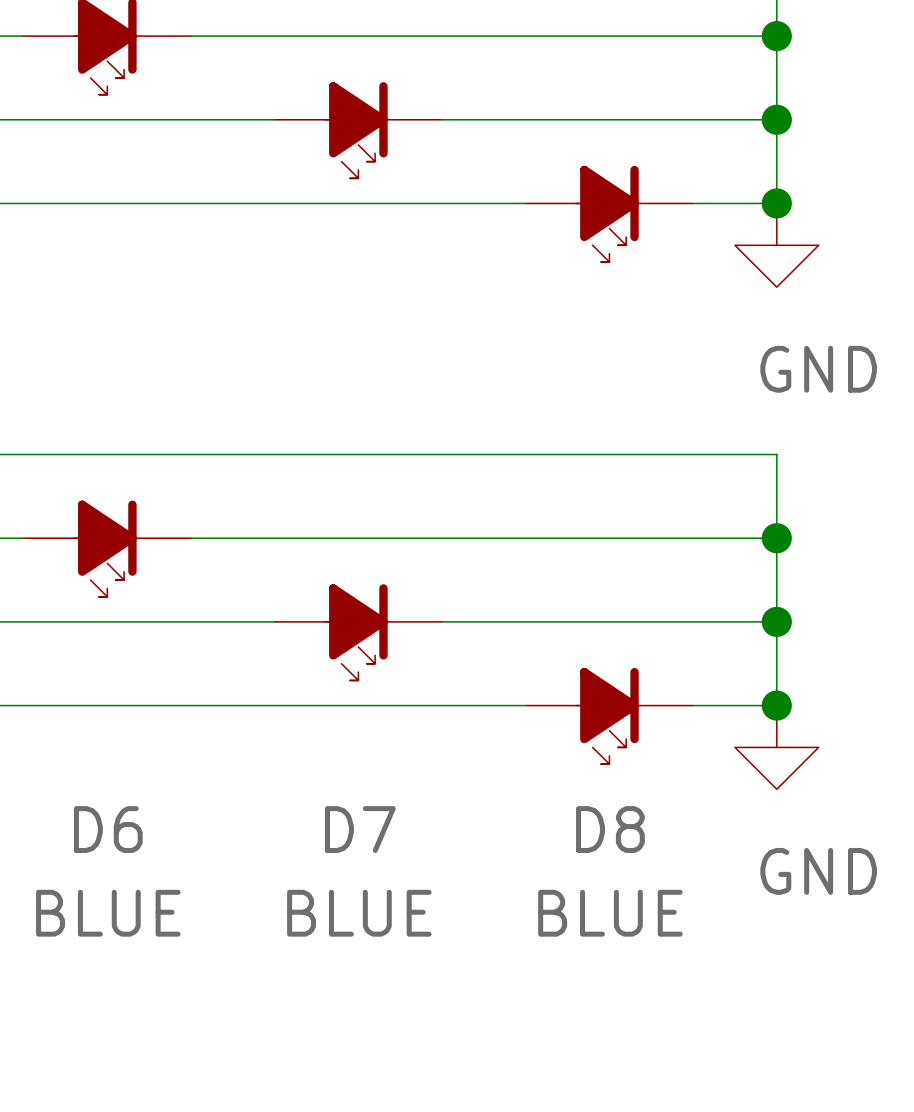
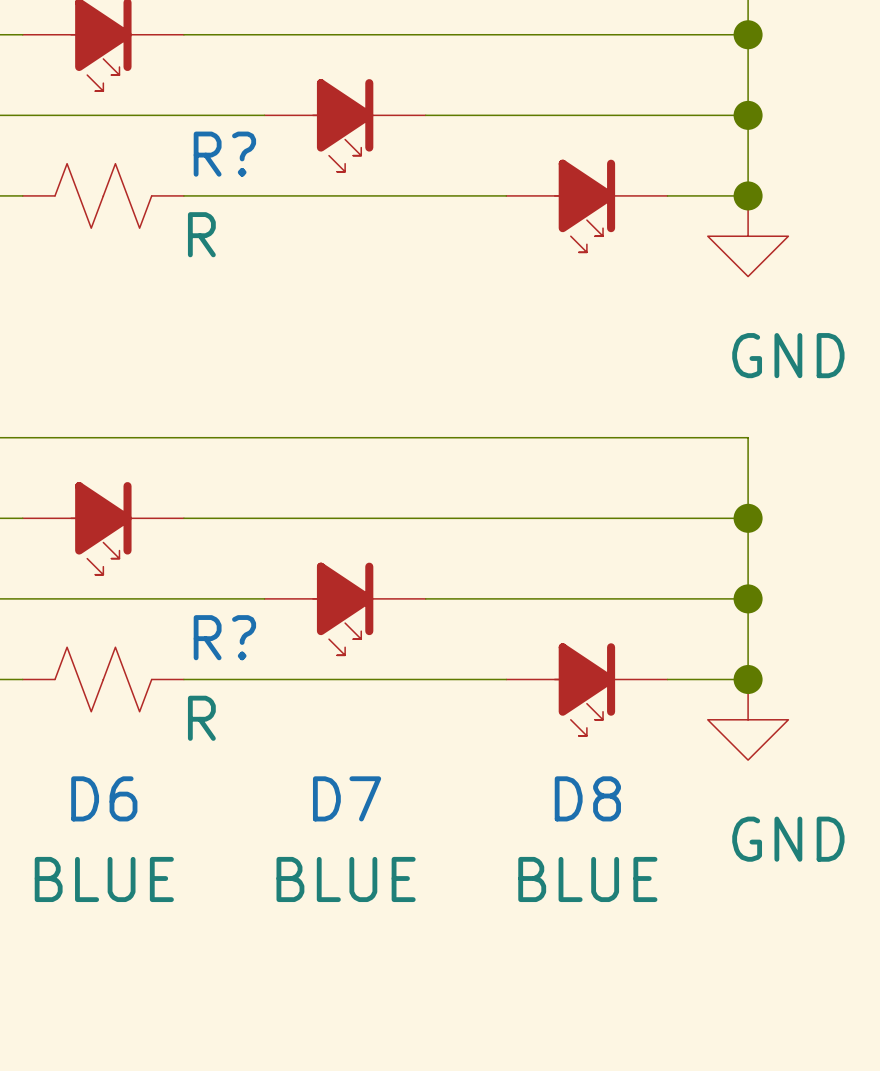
wire: (23, 203) (191, 203) -> none
R?: none -> R (103, 195)
wire: (23, 705) (191, 705) -> none
R?: none -> R (103, 679)

